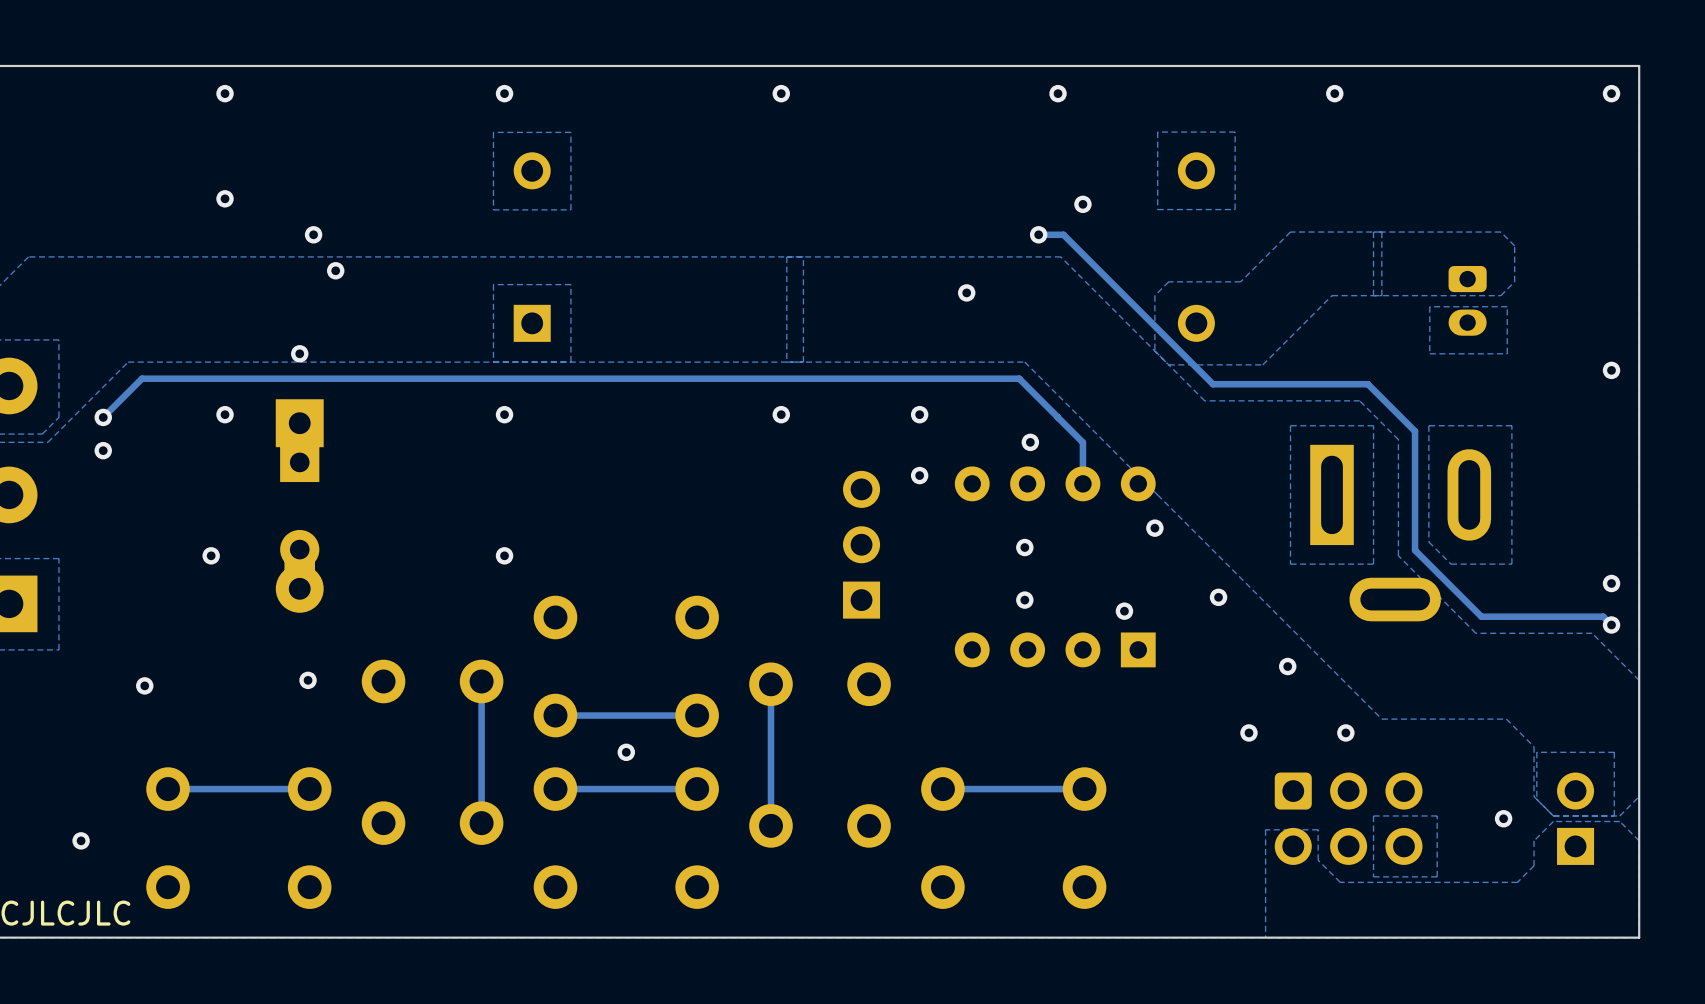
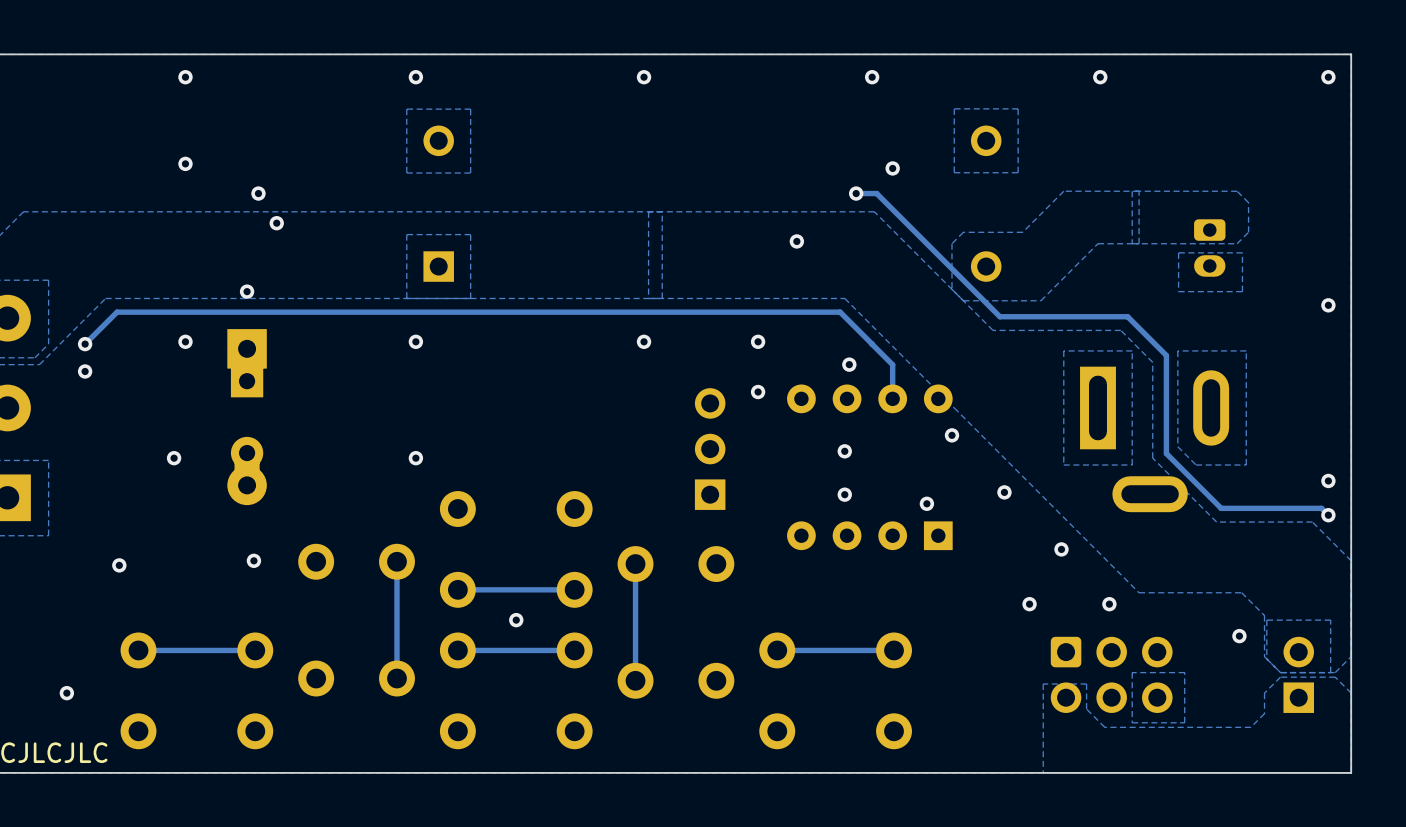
via position: (1503, 818) -> (1239, 636)

